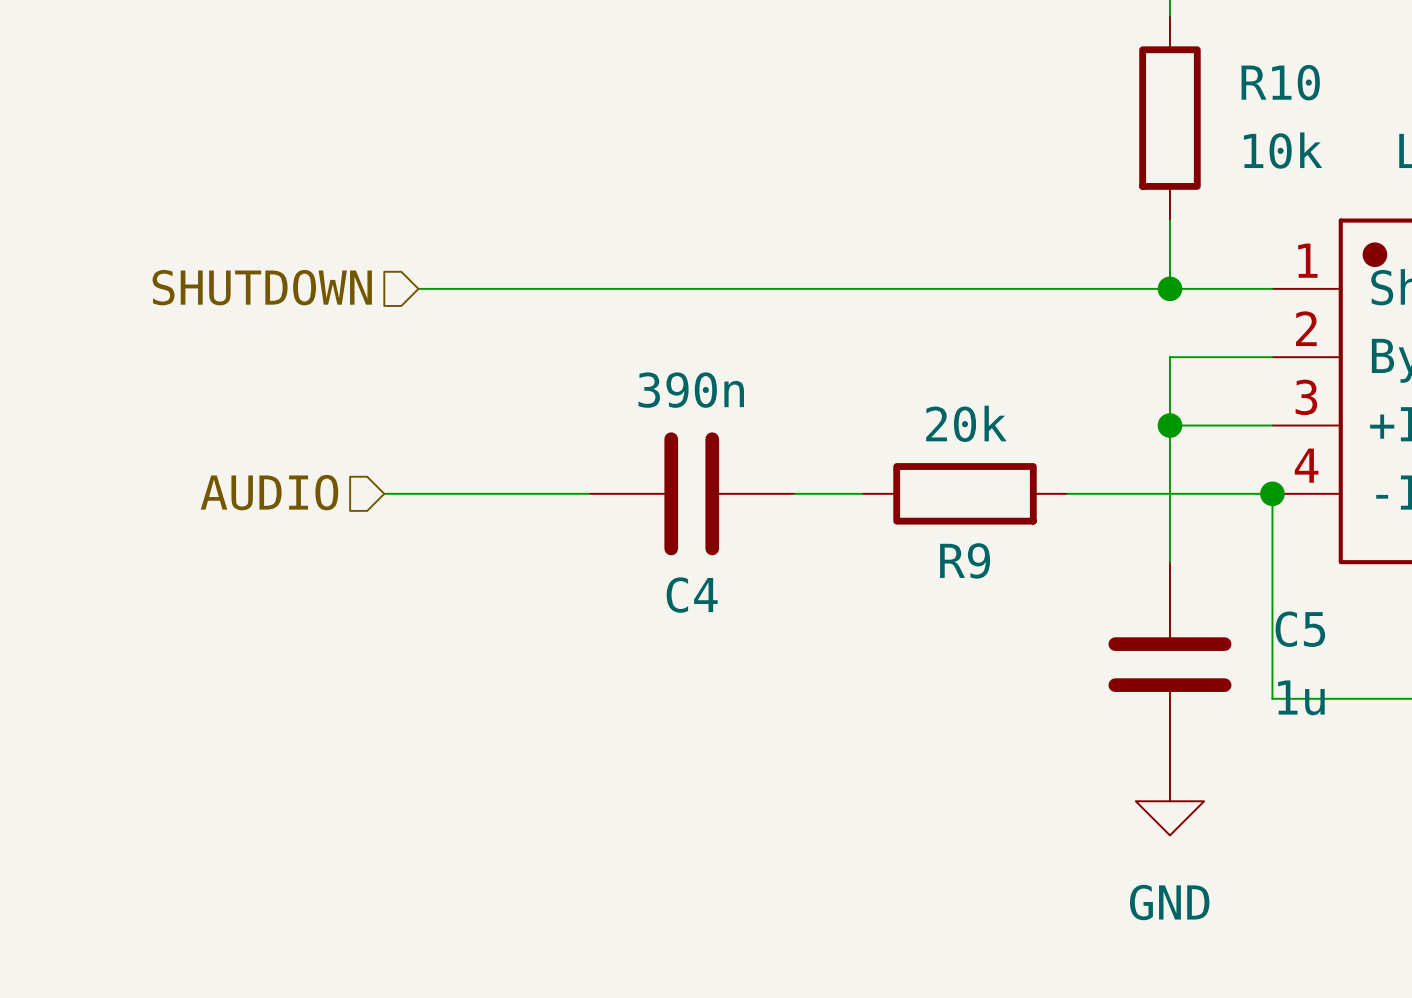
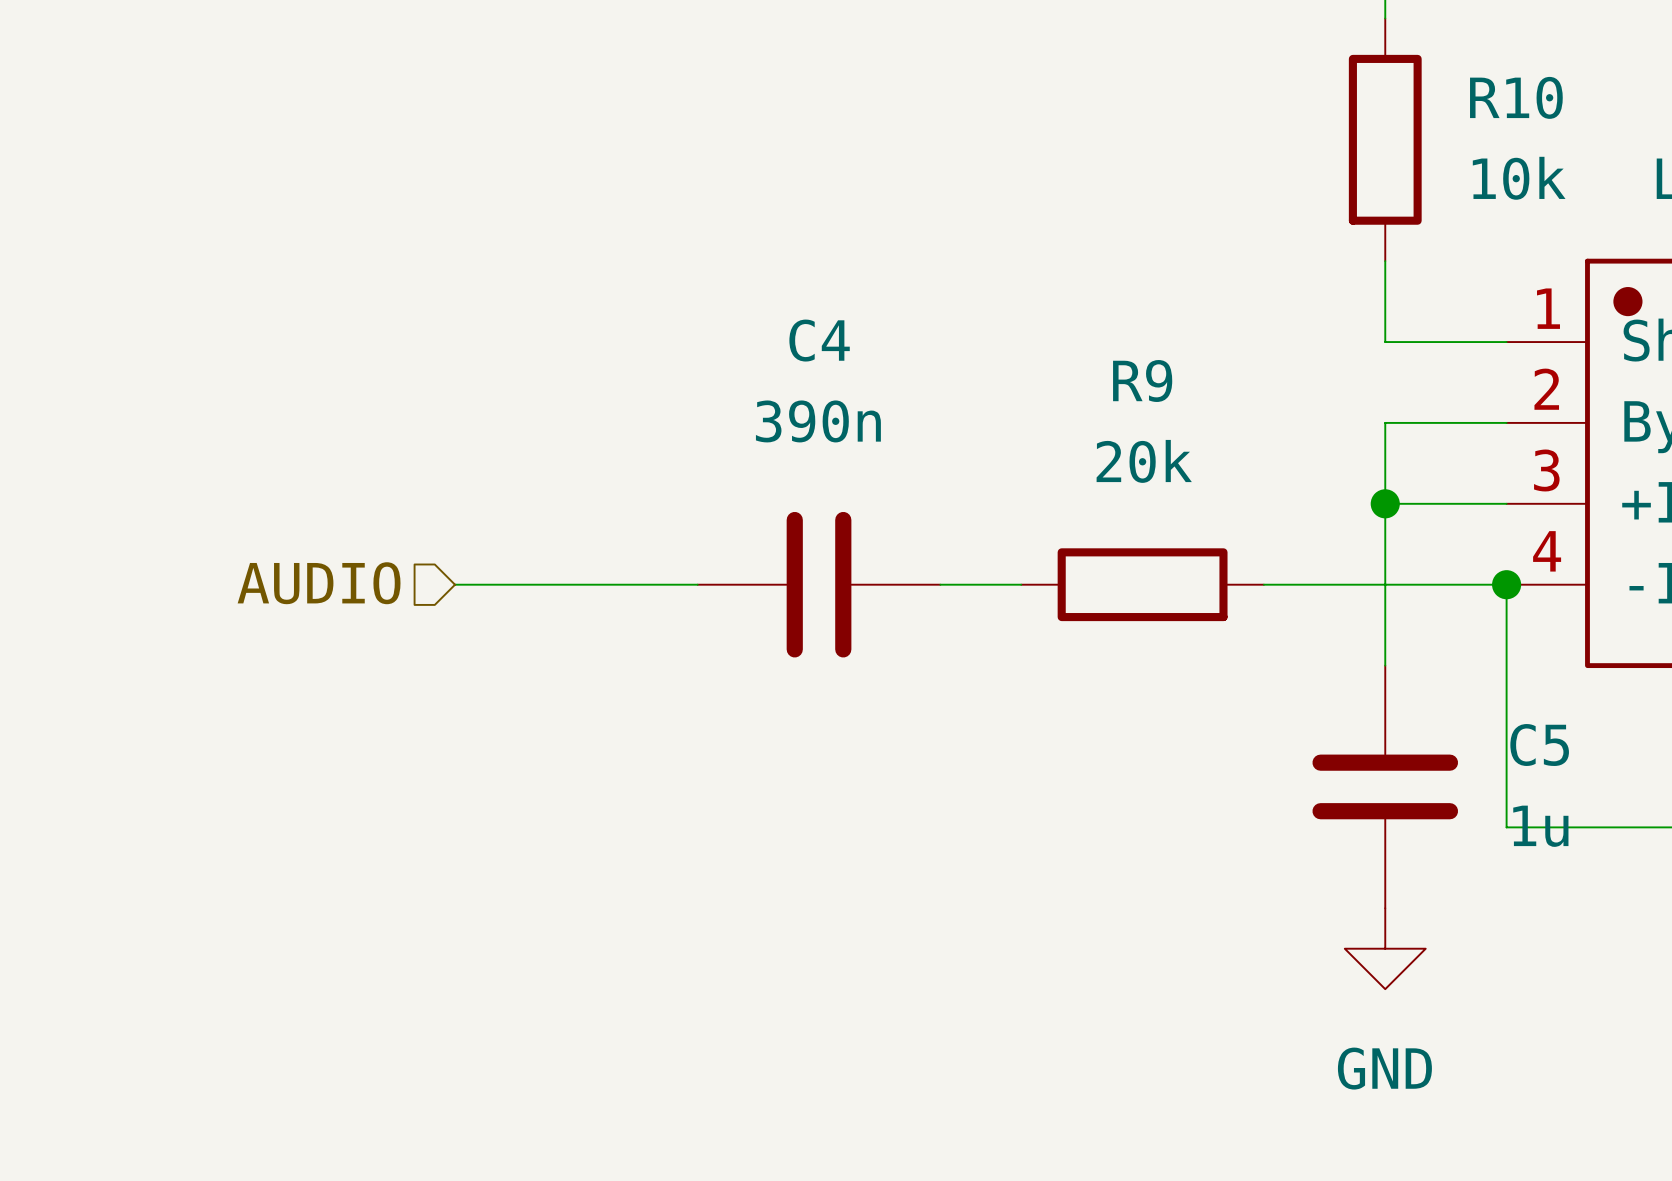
hierarchical label: SHUTDOWN (262, 287) -> none
wire: (418, 288) (1169, 288) -> none
junction: (1169, 288) -> none
C4 value position: 390n (691, 390) -> 390n (818, 421)
R9 value position: 20k (966, 423) -> 20k (1144, 461)
R9 name position: R9 (965, 560) -> R9 (1142, 381)
C4 name position: C4 (692, 595) -> C4 (819, 340)

